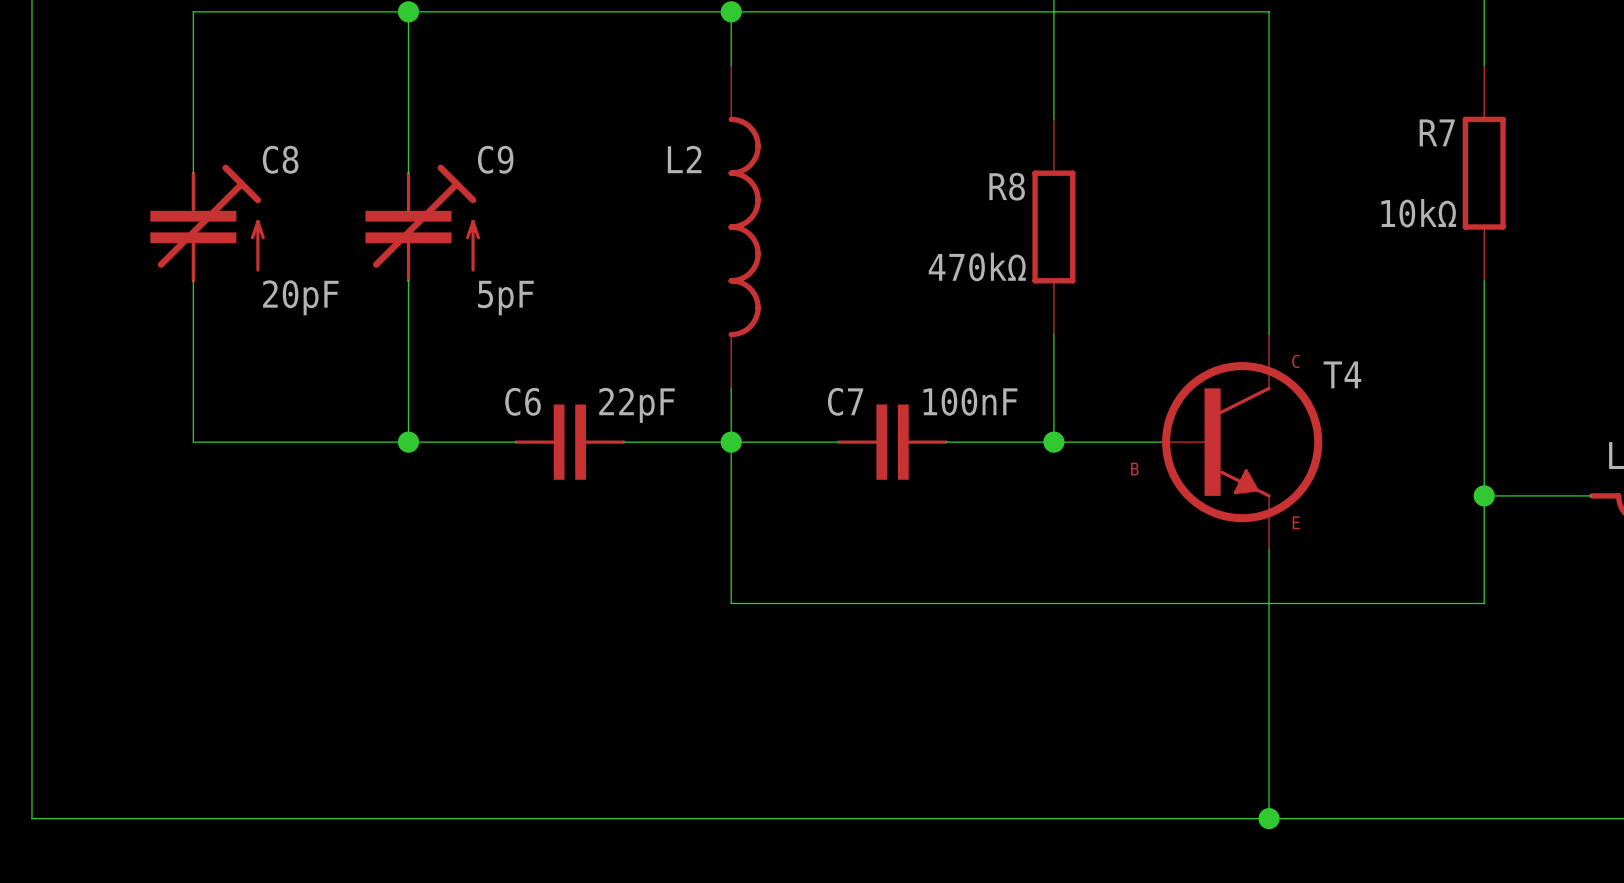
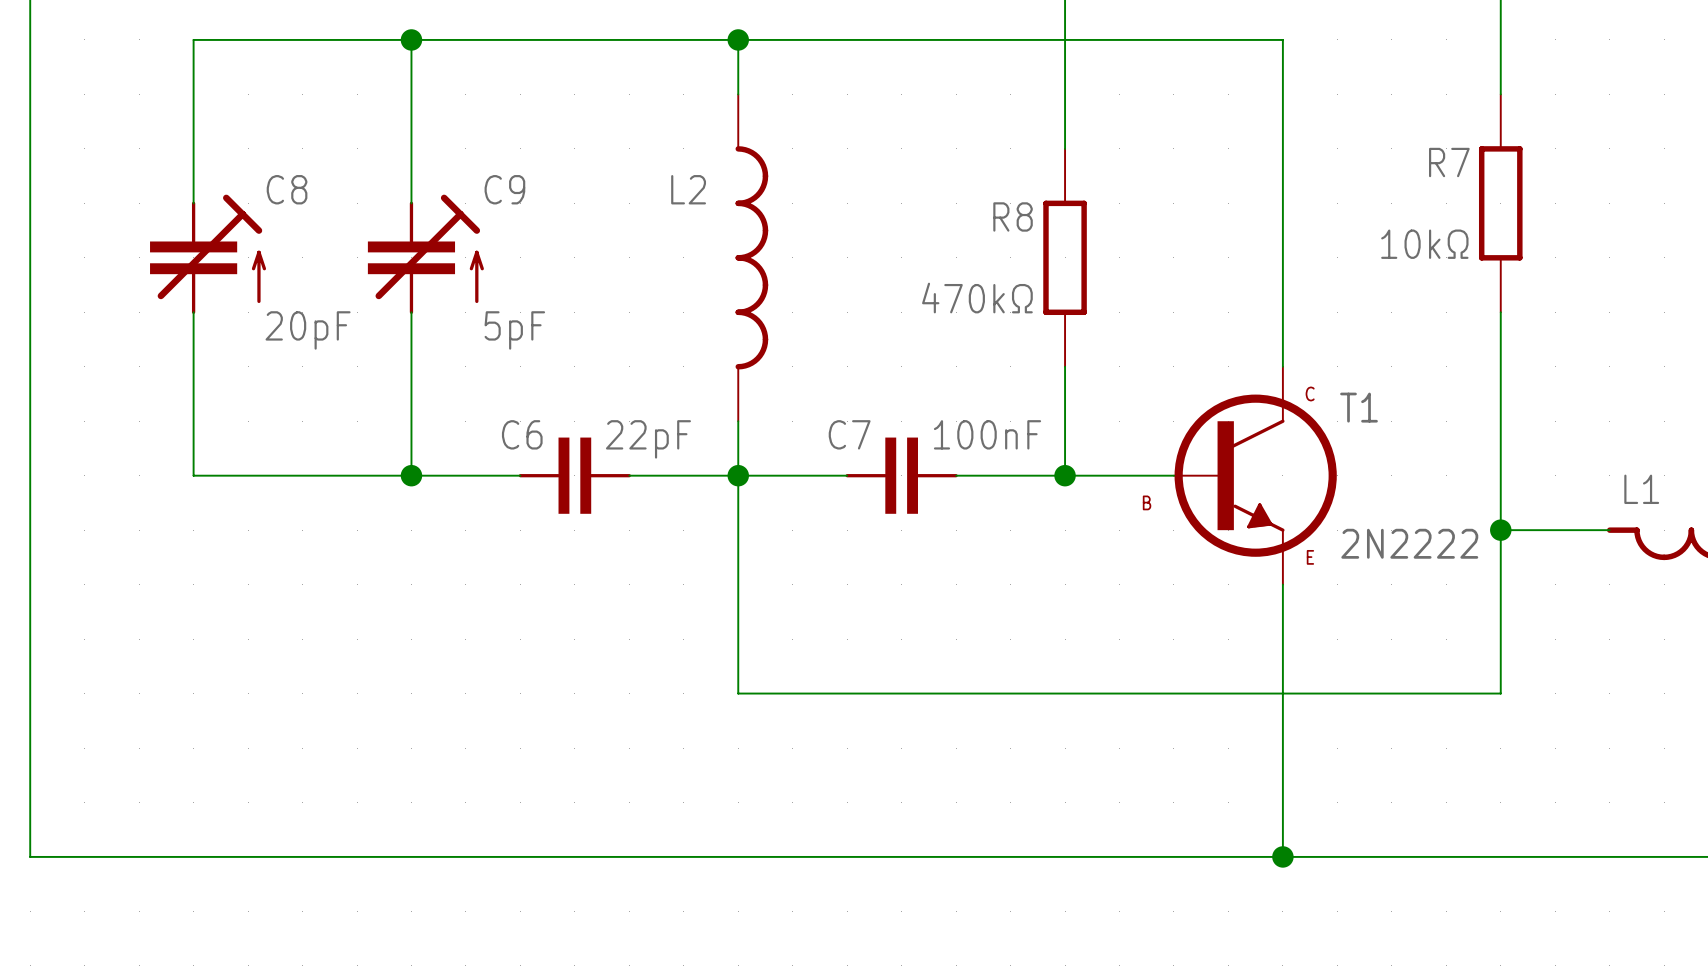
T4 name: T4 (1342, 374) -> T1 (1359, 407)
T4 value: none -> 2N2222 (1409, 543)
wire: (731, 603) (1484, 603) -> (738, 639) (738, 693) (1500, 693) (1500, 639)

